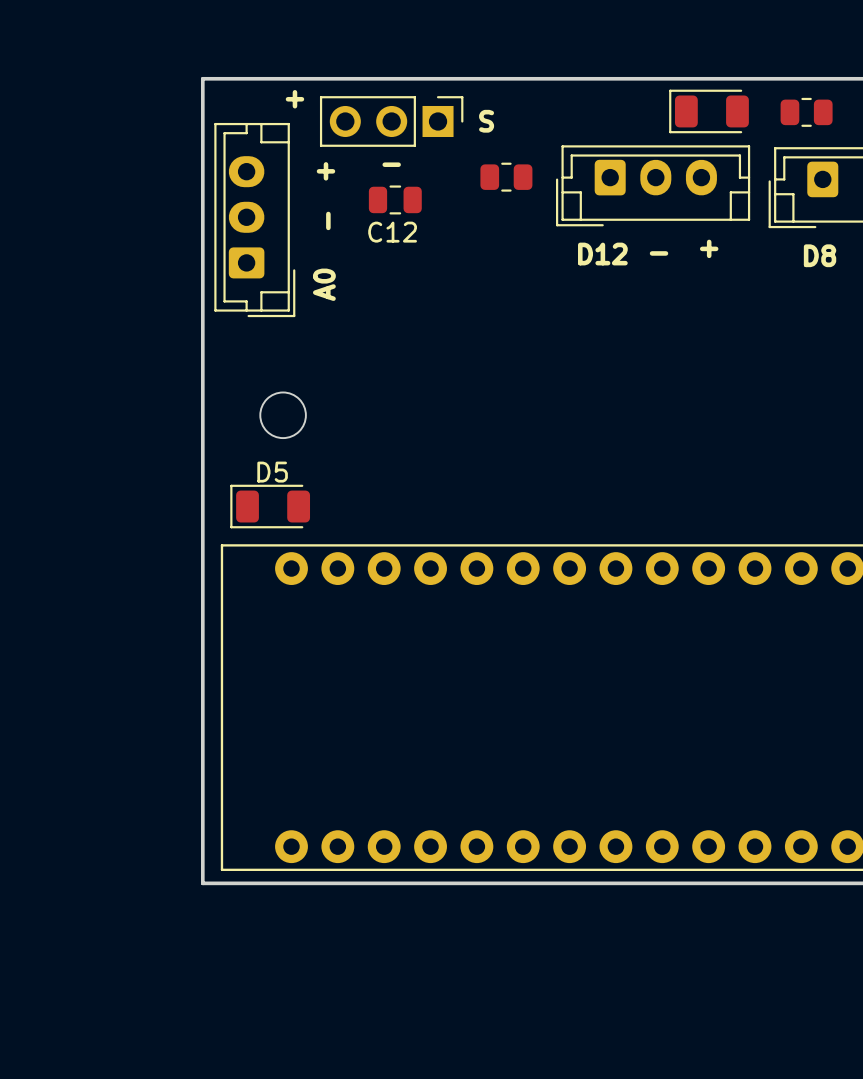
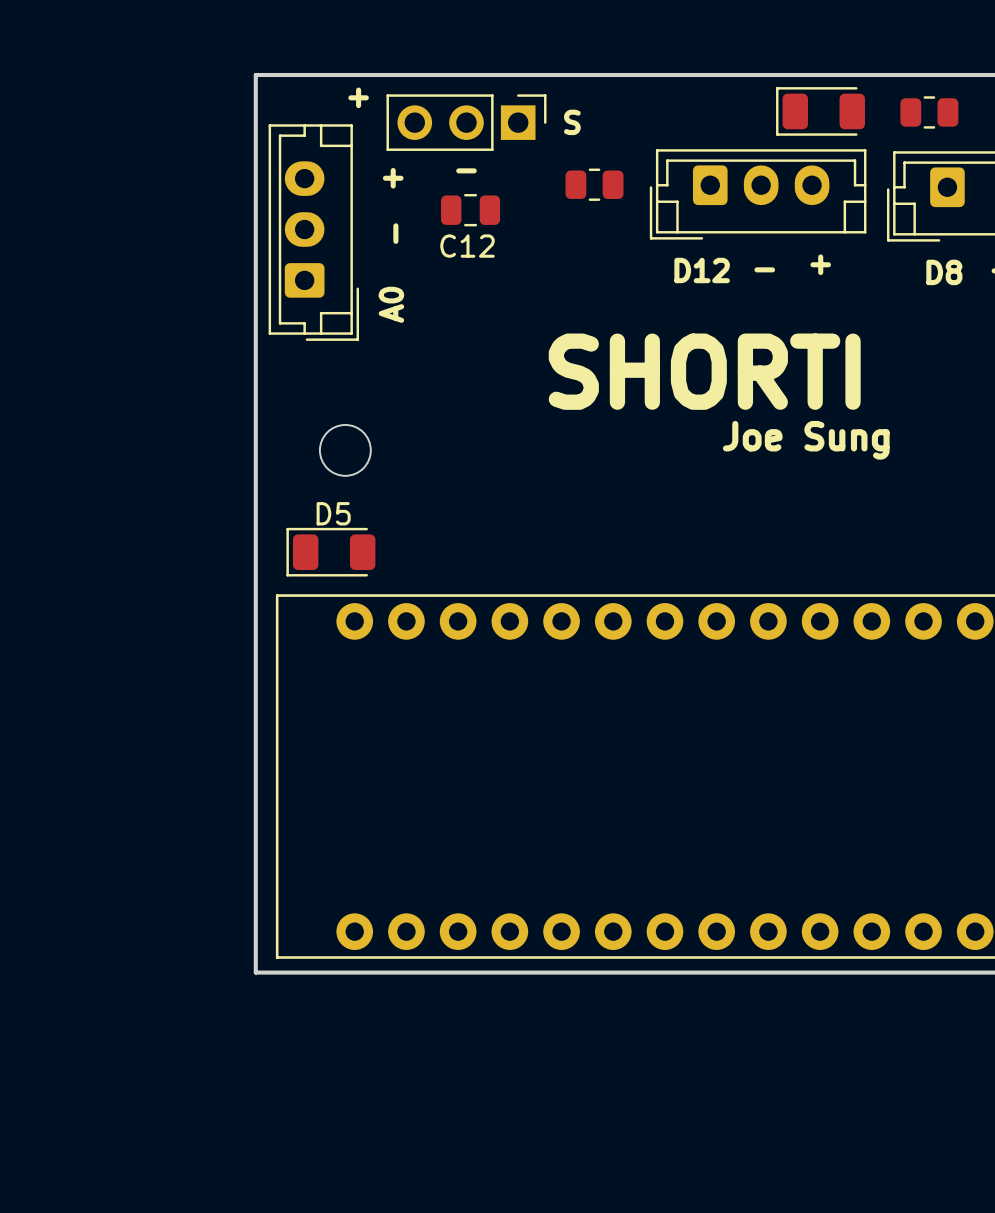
text: none -> SHORTI (704, 371)
text: none -> Joe Sung (806, 440)

